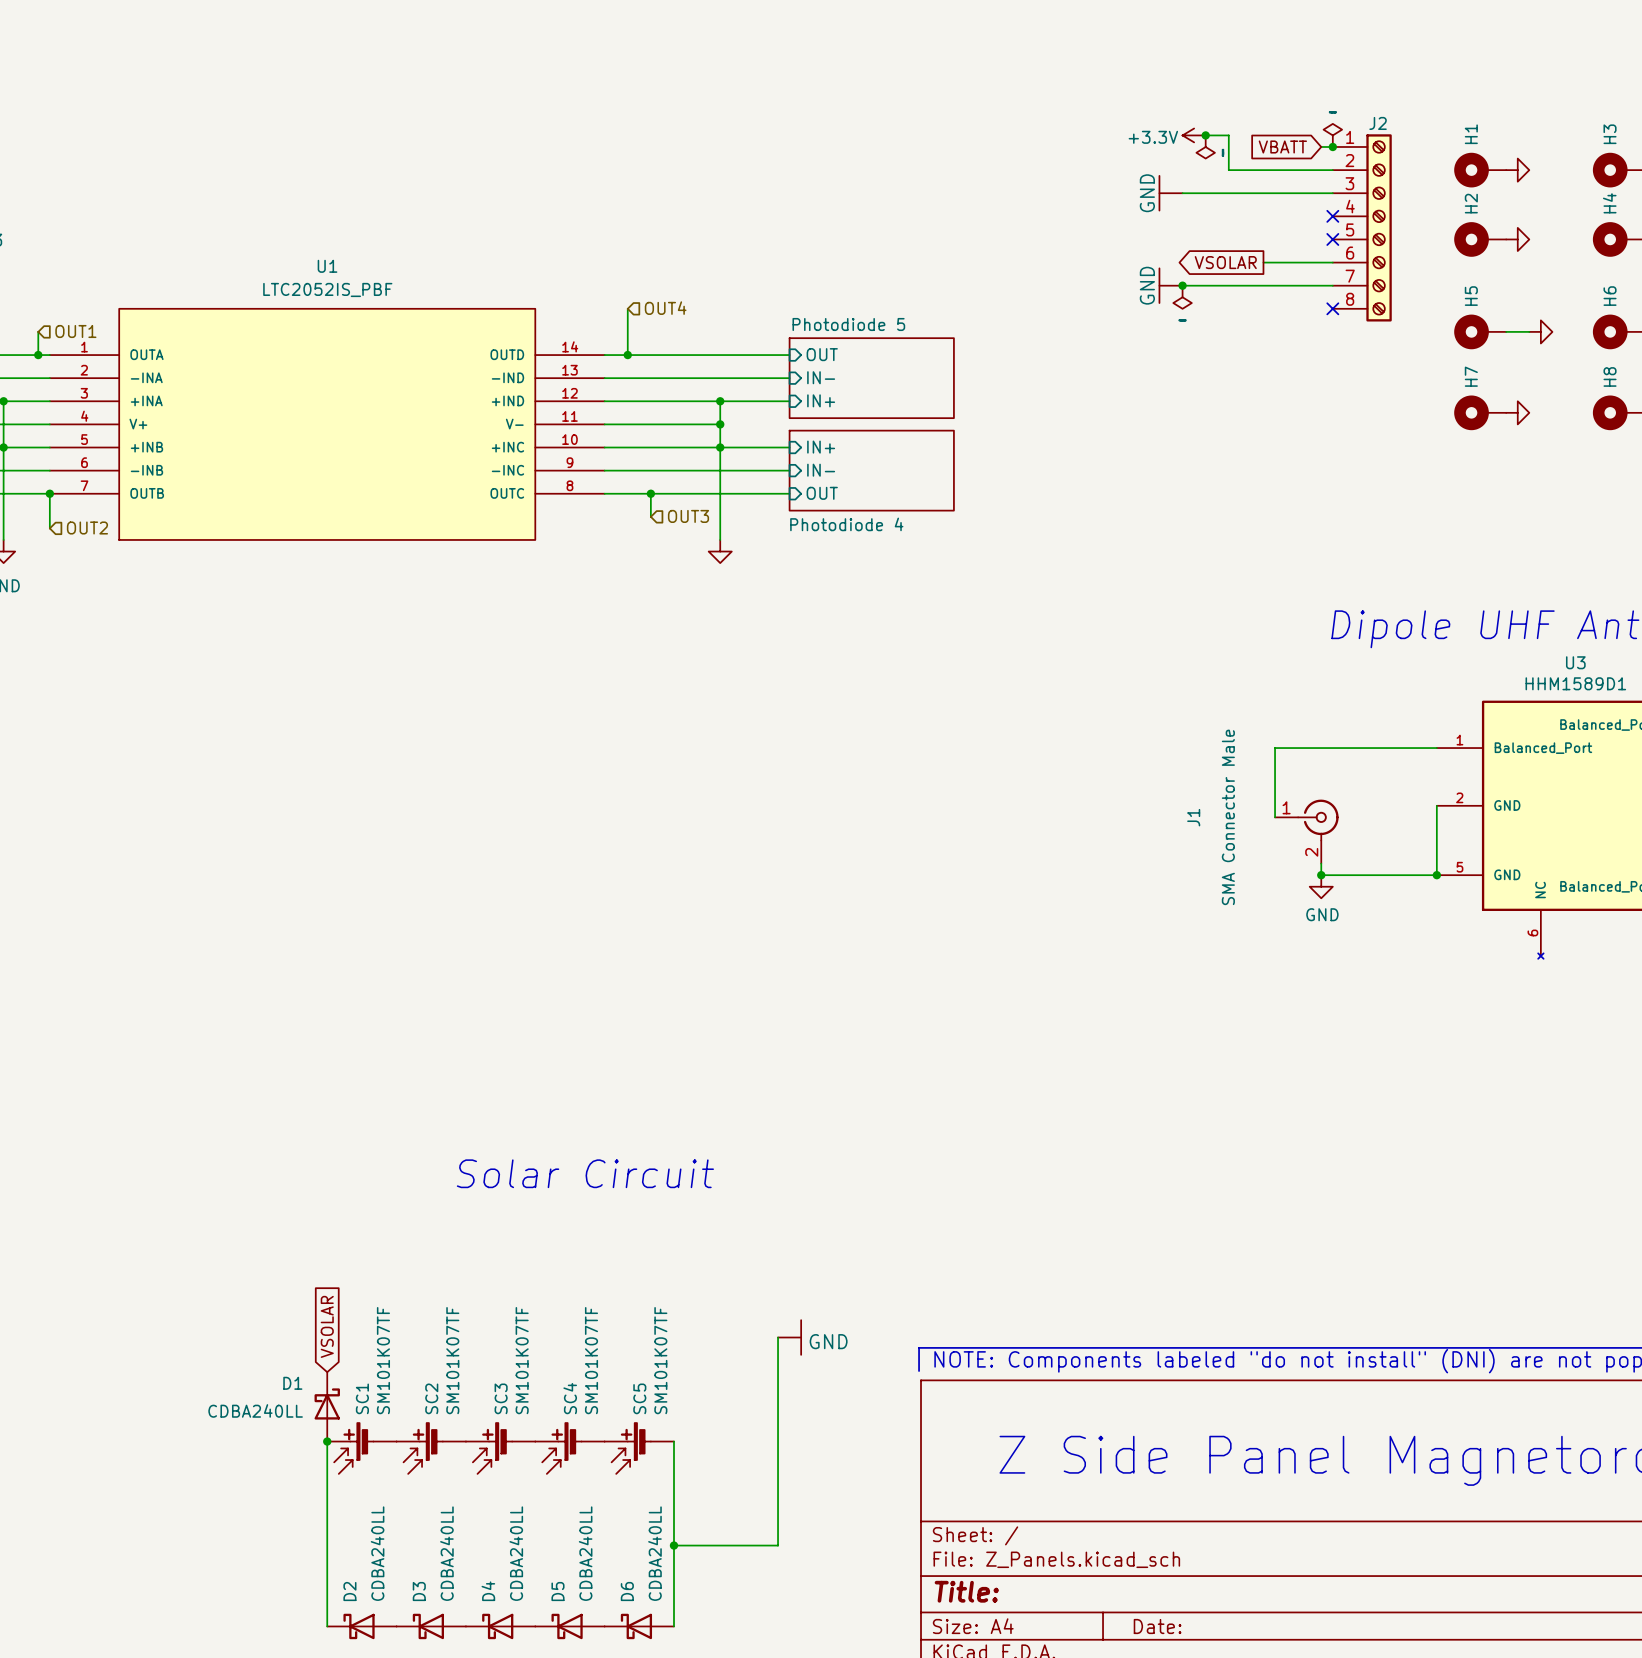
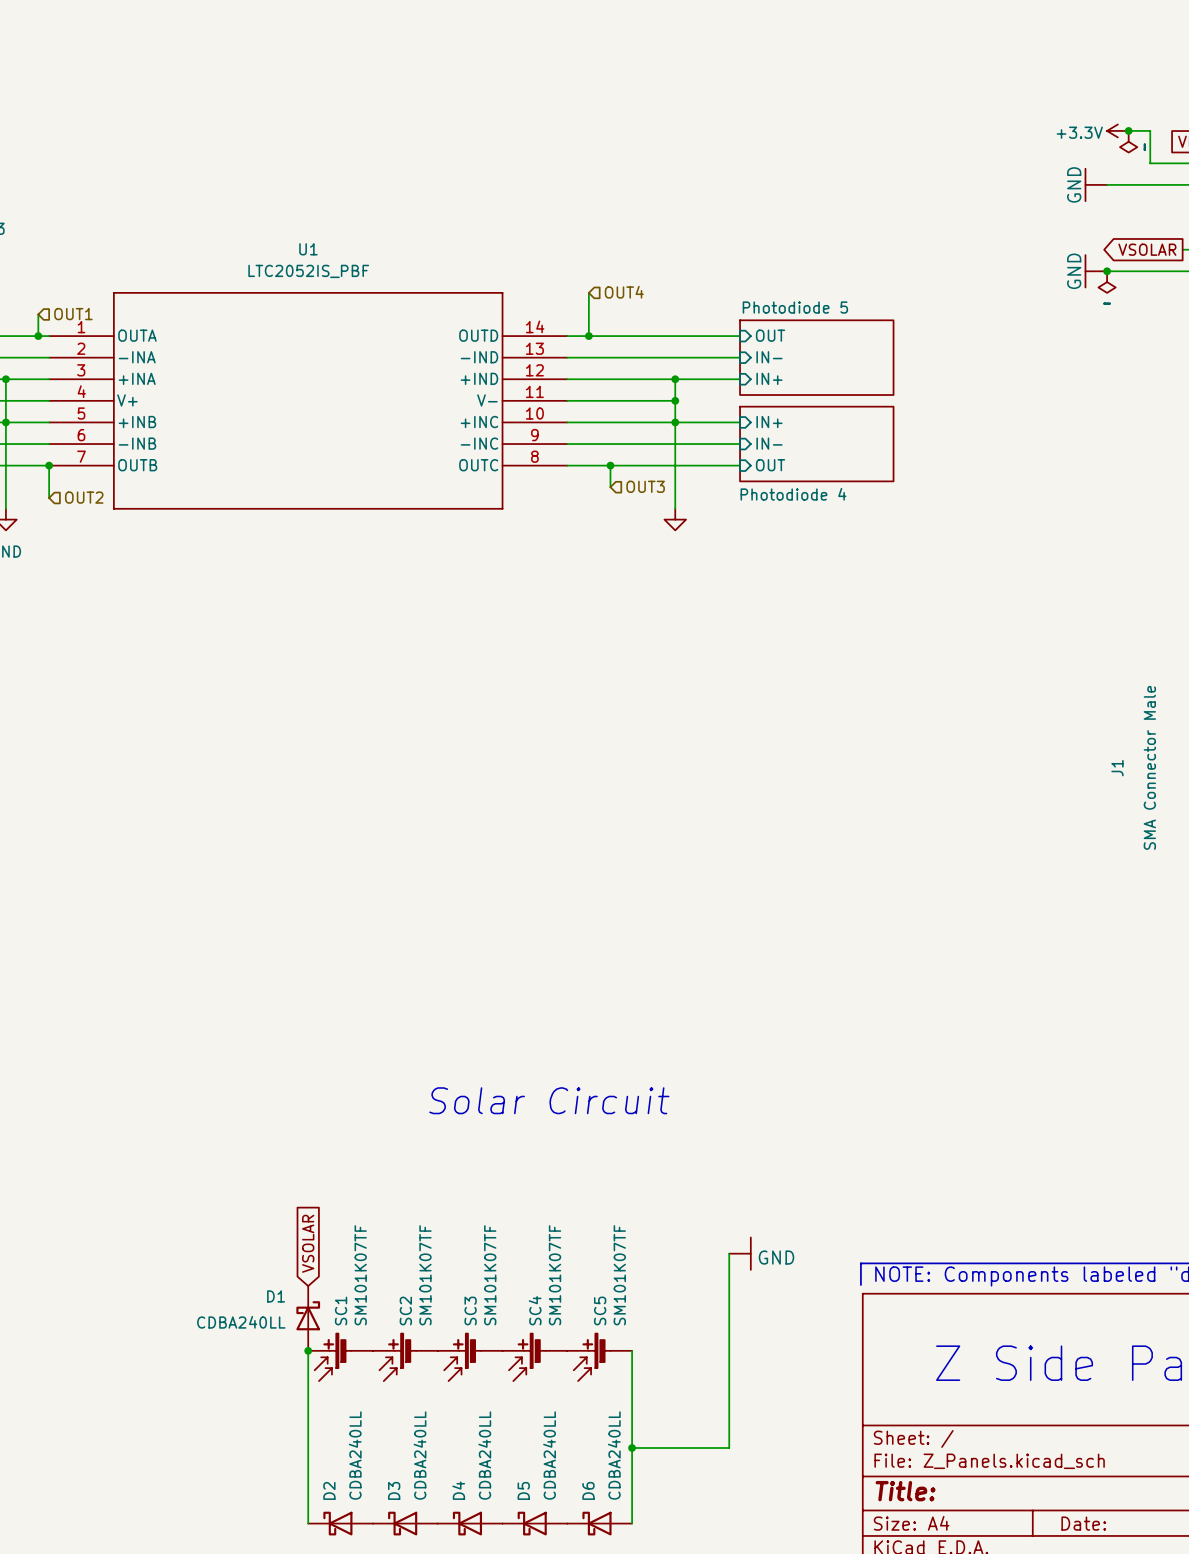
U1 symbol: [49, 308, 605, 541] -> [49, 292, 568, 510]

